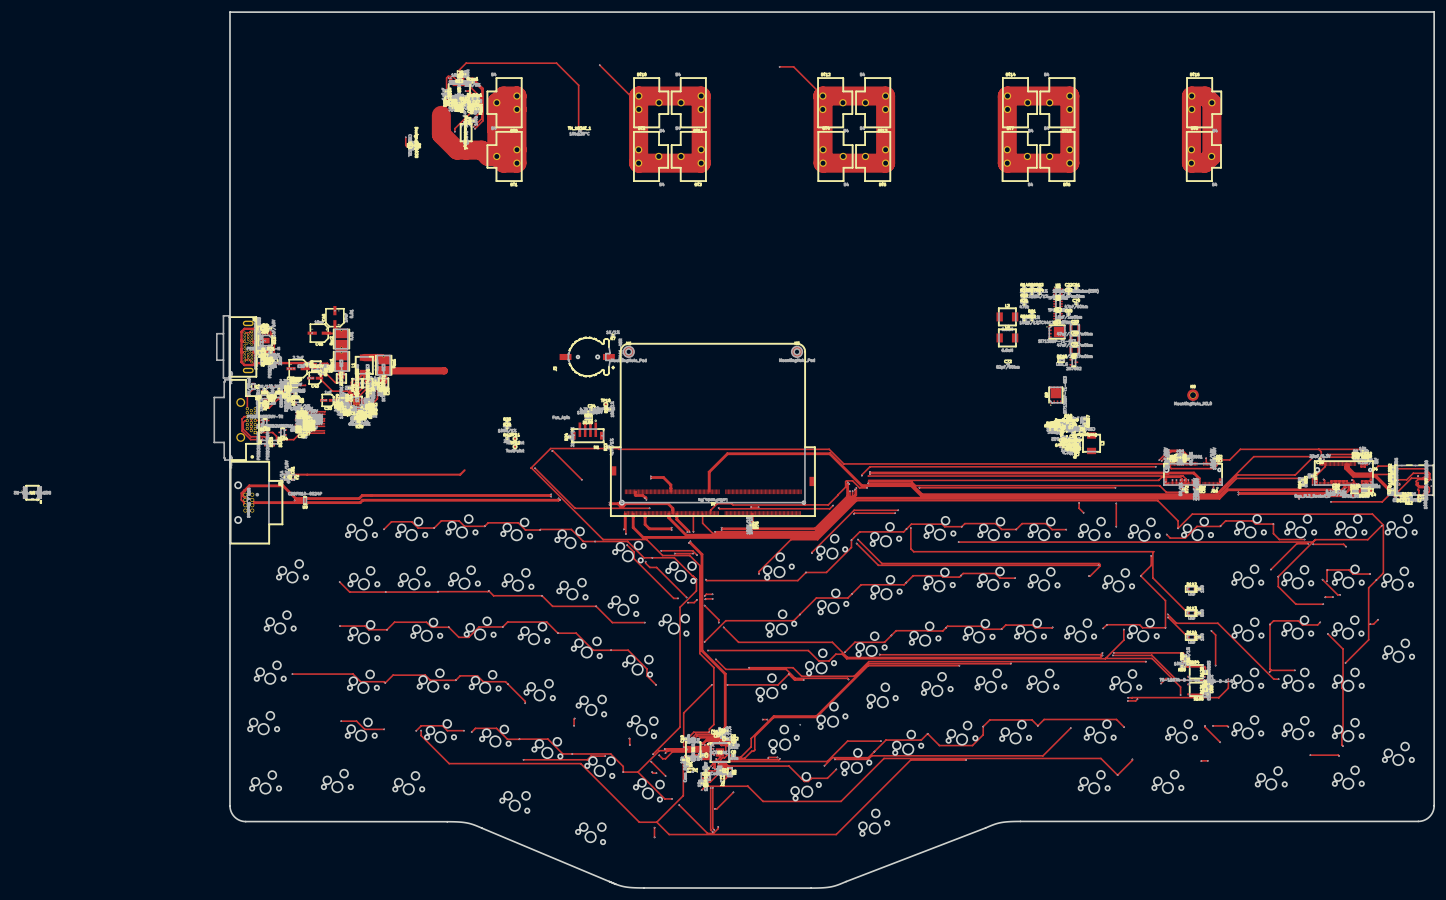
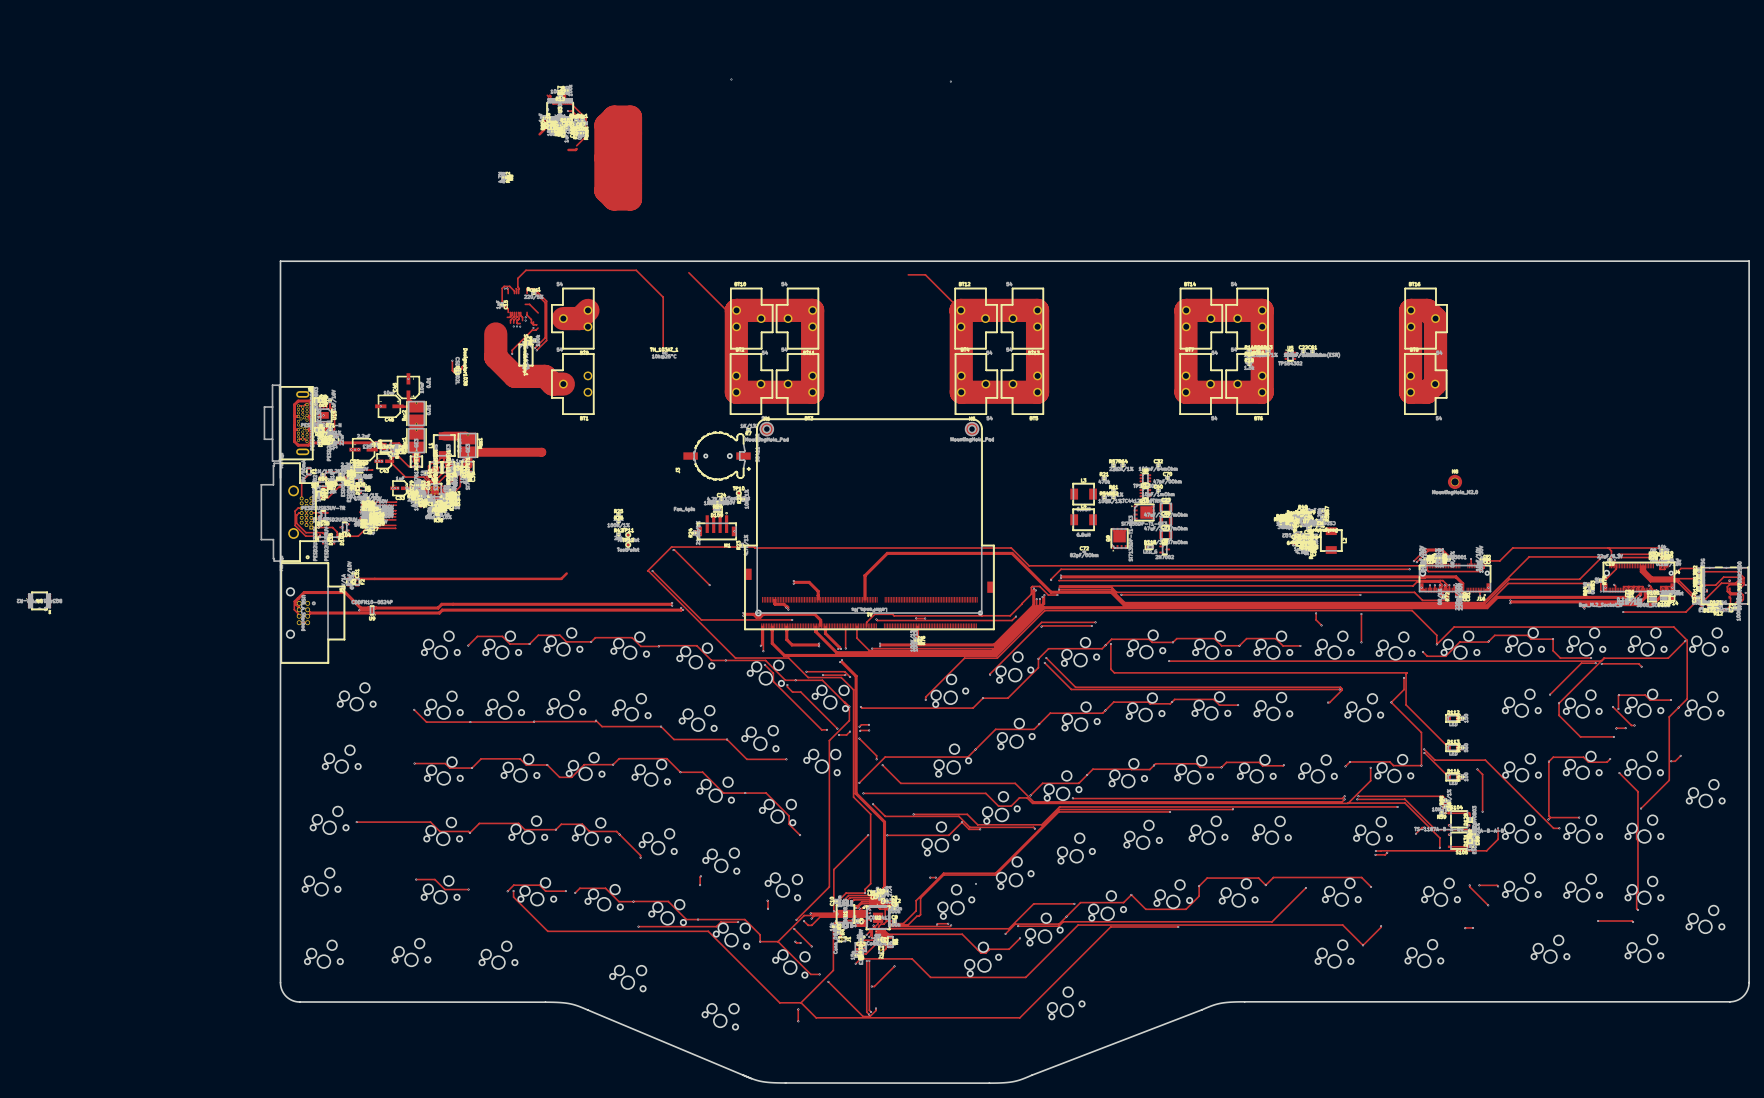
track: (599, 65) (630, 96) (638, 96) -> none
track: (779, 66) (793, 66) (822, 96) -> none
via: (448, 78) -> none
via: (450, 78) -> none
part position: (472, 81) -> (533, 293)
track: (473, 81) (481, 89) (481, 118) (473, 127) -> none
track: (456, 82) (452, 76) (446, 77) (446, 90) (451, 97) -> none
track: (460, 82) (459, 69) (466, 63) (556, 63) (578, 85) (578, 131) -> none
track: (467, 82) (467, 78) (472, 78) (483, 88) (483, 120) (474, 128) -> none
part position: (446, 91) -> (502, 304)
track: (638, 96) (701, 96) (701, 163) (638, 163) (638, 96) -> none
track: (822, 96) (885, 96) (885, 163) (823, 163) (822, 96) -> none
track: (1007, 96) (1069, 96) (1069, 163) (1007, 163) (1007, 96) -> none
track: (1191, 96) (1205, 96) (1211, 102) (1211, 156) (1204, 163) (1191, 163) (1191, 96) -> none
part position: (504, 102) -> (572, 318)
part position: (651, 102) -> (751, 318)
part position: (688, 102) -> (797, 318)
part position: (835, 102) -> (976, 318)
part position: (873, 102) -> (1022, 318)
part position: (1019, 102) -> (1201, 318)
part position: (1057, 102) -> (1247, 318)
part position: (1204, 102) -> (1426, 318)
track: (476, 110) (471, 112) (454, 128) (454, 131) -> none
track: (441, 115) (441, 134) (457, 150) (481, 150) (488, 156) (496, 156) -> none
part position: (472, 120) -> (534, 340)
via: (473, 127) -> none
via: (474, 128) -> none
via: (454, 131) -> none
part position: (466, 131) -> (525, 353)
part position: (579, 131) -> (664, 353)
via: (581, 131) -> none
track: (405, 137) (405, 145) (408, 146) -> none
via: (405, 137) -> none
part position: (410, 144) -> (457, 369)
part position: (504, 156) -> (572, 384)
part position: (651, 156) -> (751, 384)
part position: (688, 156) -> (797, 384)
part position: (835, 156) -> (976, 384)
part position: (873, 156) -> (1022, 384)
part position: (1019, 156) -> (1201, 384)
part position: (1057, 156) -> (1247, 384)
part position: (1203, 156) -> (1425, 384)
board edge: (229, 214) (229, 12) (1434, 11) (1434, 805) -> (280, 261) (1749, 261) (1749, 982)
track: none -> (688, 272) (726, 310) (736, 310)
track: none -> (908, 274) (925, 274) (960, 310)
via: none -> (504, 288)
track: none -> (507, 288) (508, 293)
via: none -> (507, 288)
track: none -> (515, 288) (516, 293)
track: none -> (514, 293) (509, 286) (502, 288) (502, 303) (508, 309) (508, 312)
track: none -> (518, 293) (517, 278) (525, 270) (636, 270) (663, 297) (663, 353)
track: none -> (527, 293) (527, 288) (534, 288) (546, 301) (546, 340) (536, 350)
track: none -> (535, 293) (545, 302) (545, 337) (534, 348)
track: none -> (525, 304) (529, 304) (538, 312)
track: none -> (587, 310) (579, 318) (563, 318)
track: none -> (736, 310) (812, 310) (812, 392) (736, 392) (736, 310)
track: none -> (960, 310) (1037, 310) (1037, 392) (961, 392) (960, 310)
track: none -> (1186, 310) (1262, 310) (1262, 392) (1185, 392) (1186, 310)
track: none -> (1410, 310) (1427, 310) (1435, 318) (1435, 383) (1426, 392) (1410, 392) (1410, 310)
track: none -> (510, 312) (510, 317)
track: none -> (512, 312) (510, 317) (507, 317)
track: none -> (514, 312) (514, 316) (510, 320)
track: none -> (516, 312) (516, 317)
track: none -> (518, 312) (516, 323) (520, 323)
track: none -> (520, 312) (522, 320)
track: none -> (527, 312) (533, 324)
track: none -> (516, 317) (513, 323)
via: none -> (525, 317)
track: none -> (510, 320) (510, 323)
via: none -> (525, 320)
track: none -> (533, 321) (533, 324)
track: none -> (536, 324) (533, 324)
via: none -> (513, 326)
via: none -> (516, 326)
via: none -> (520, 326)
via: none -> (533, 327)
track: none -> (538, 328) (532, 330) (512, 350) (512, 353)
track: none -> (495, 333) (495, 357) (514, 376) (545, 376) (552, 384) (563, 384)
via: none -> (534, 348)
via: none -> (536, 350)
via: none -> (666, 353)
via: none -> (512, 353)
part position: (1031, 293) -> (1113, 465)
part position: (1039, 293) -> (1122, 465)
part position: (1068, 293) -> (1158, 465)
track: none -> (452, 360) (452, 370) (456, 372)
via: none -> (452, 360)
track: none -> (463, 365) (461, 369) (458, 369)
part position: (1024, 303) -> (1104, 478)
part position: (1058, 303) -> (1145, 477)
part position: (1076, 303) -> (1167, 477)
part position: (1031, 314) -> (1113, 490)
part position: (1068, 314) -> (1158, 490)
part position: (1058, 315) -> (1145, 492)
part position: (1007, 316) -> (1083, 494)
part position: (1024, 319) -> (1104, 497)
part position: (1031, 319) -> (1113, 497)
part position: (1074, 327) -> (1165, 507)
part position: (1056, 331) -> (1143, 512)
part position: (612, 335) -> (748, 429)
part position: (1007, 337) -> (1083, 519)
part position: (1074, 339) -> (1165, 521)
part position: (1074, 350) -> (1165, 534)
part position: (587, 356) -> (717, 456)
part position: (1061, 360) -> (1149, 547)
part position: (1073, 361) -> (1164, 549)
part position: (1007, 364) -> (1084, 551)
part position: (1055, 395) -> (1119, 539)

